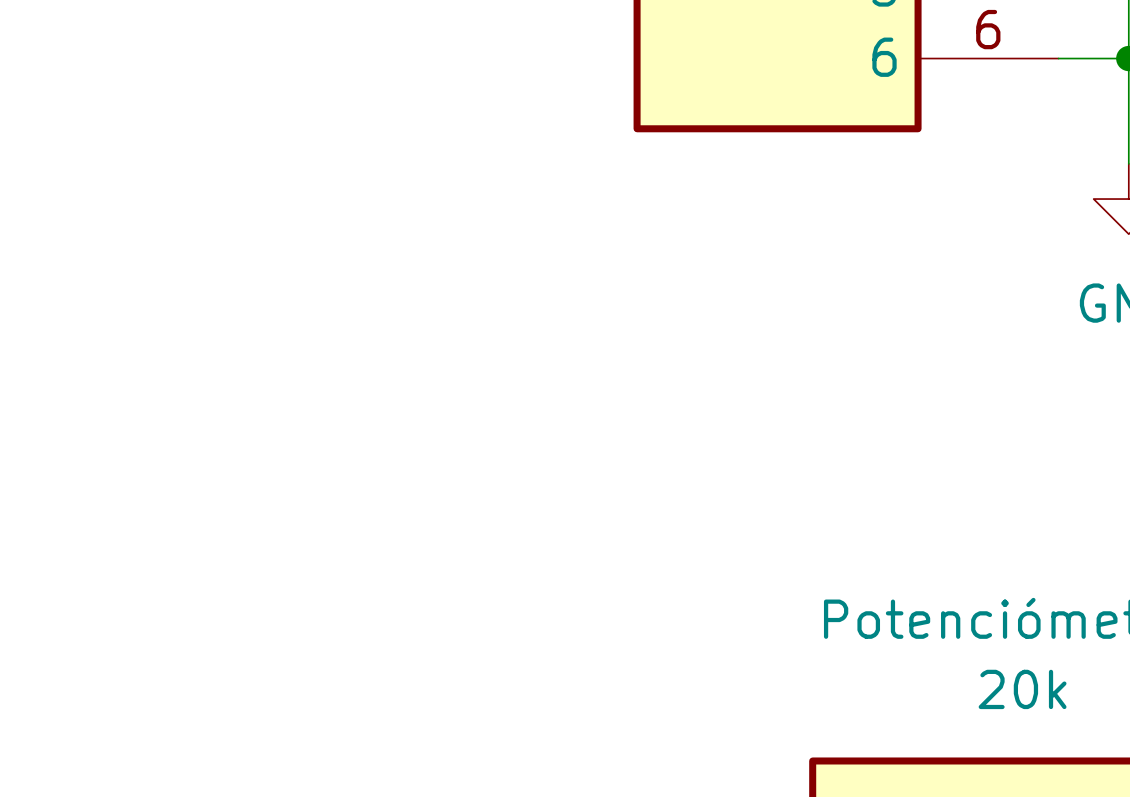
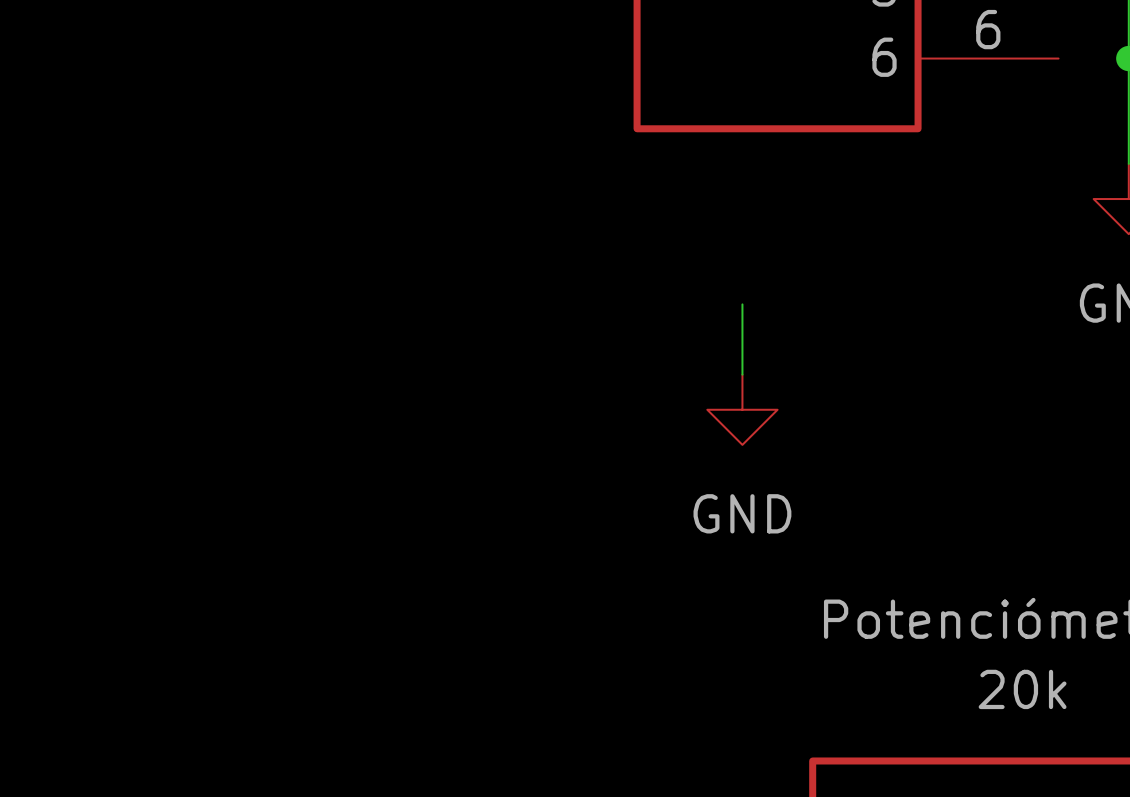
wire: (1058, 58) (1128, 58) -> none
wire: none -> (742, 304) (742, 374)
power symbol: none -> GND (742, 409)

